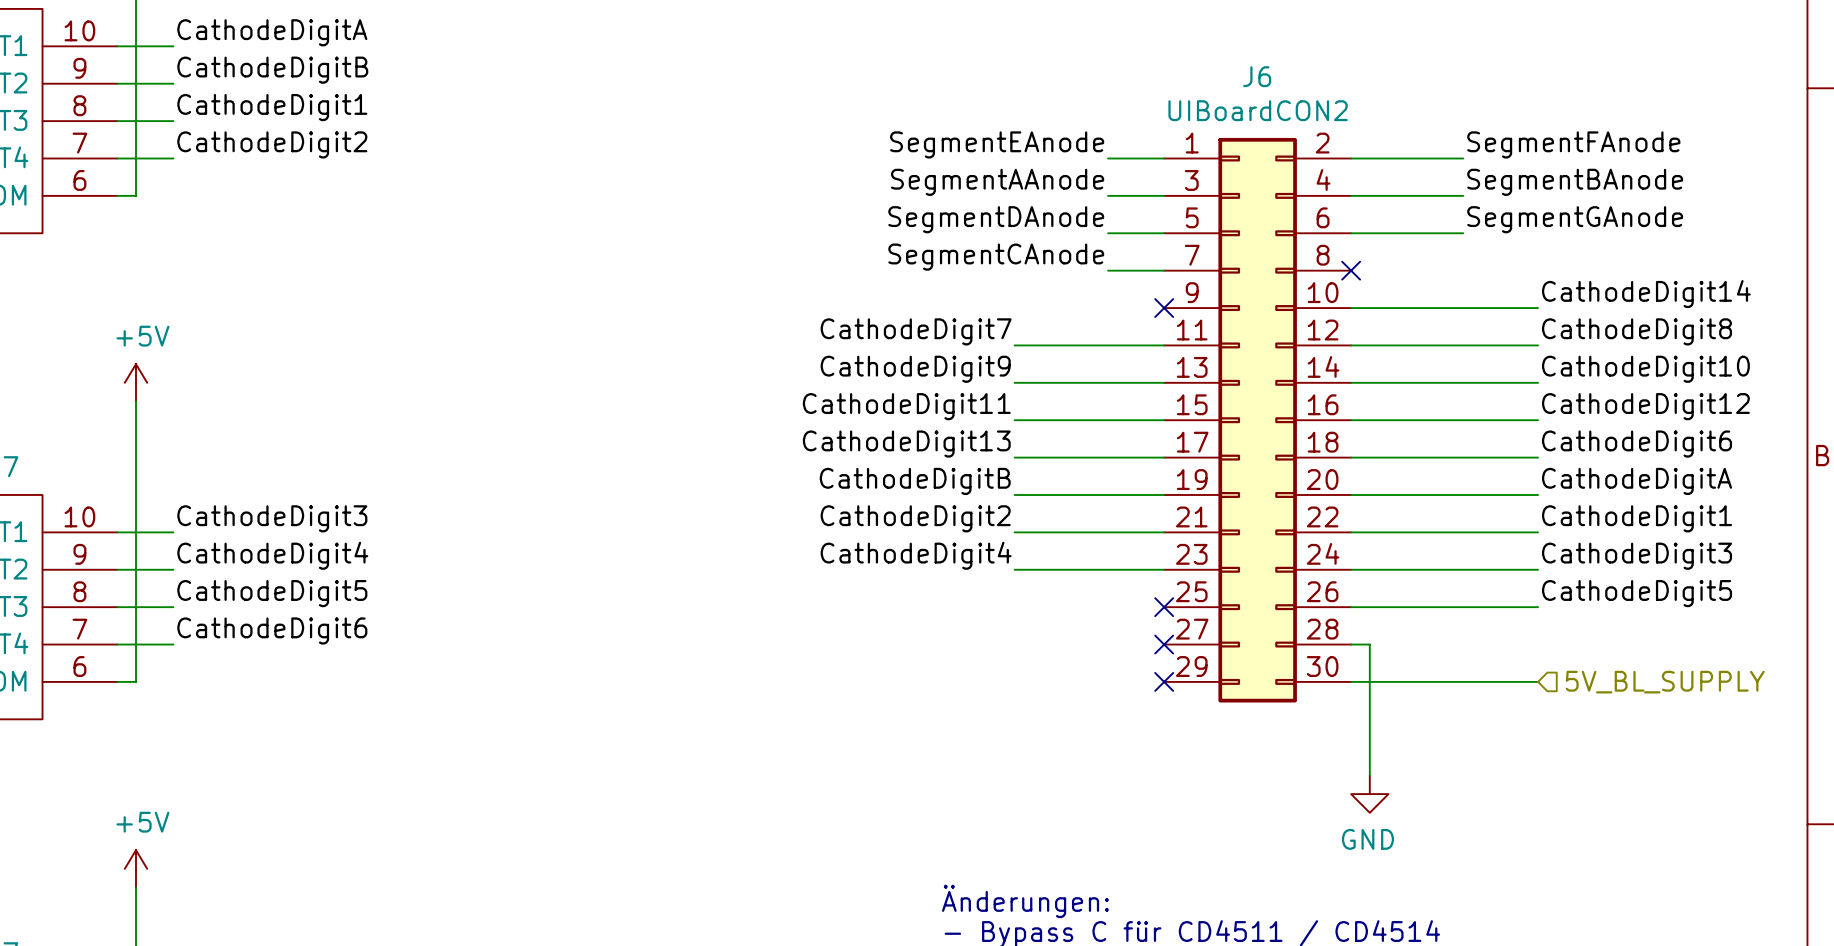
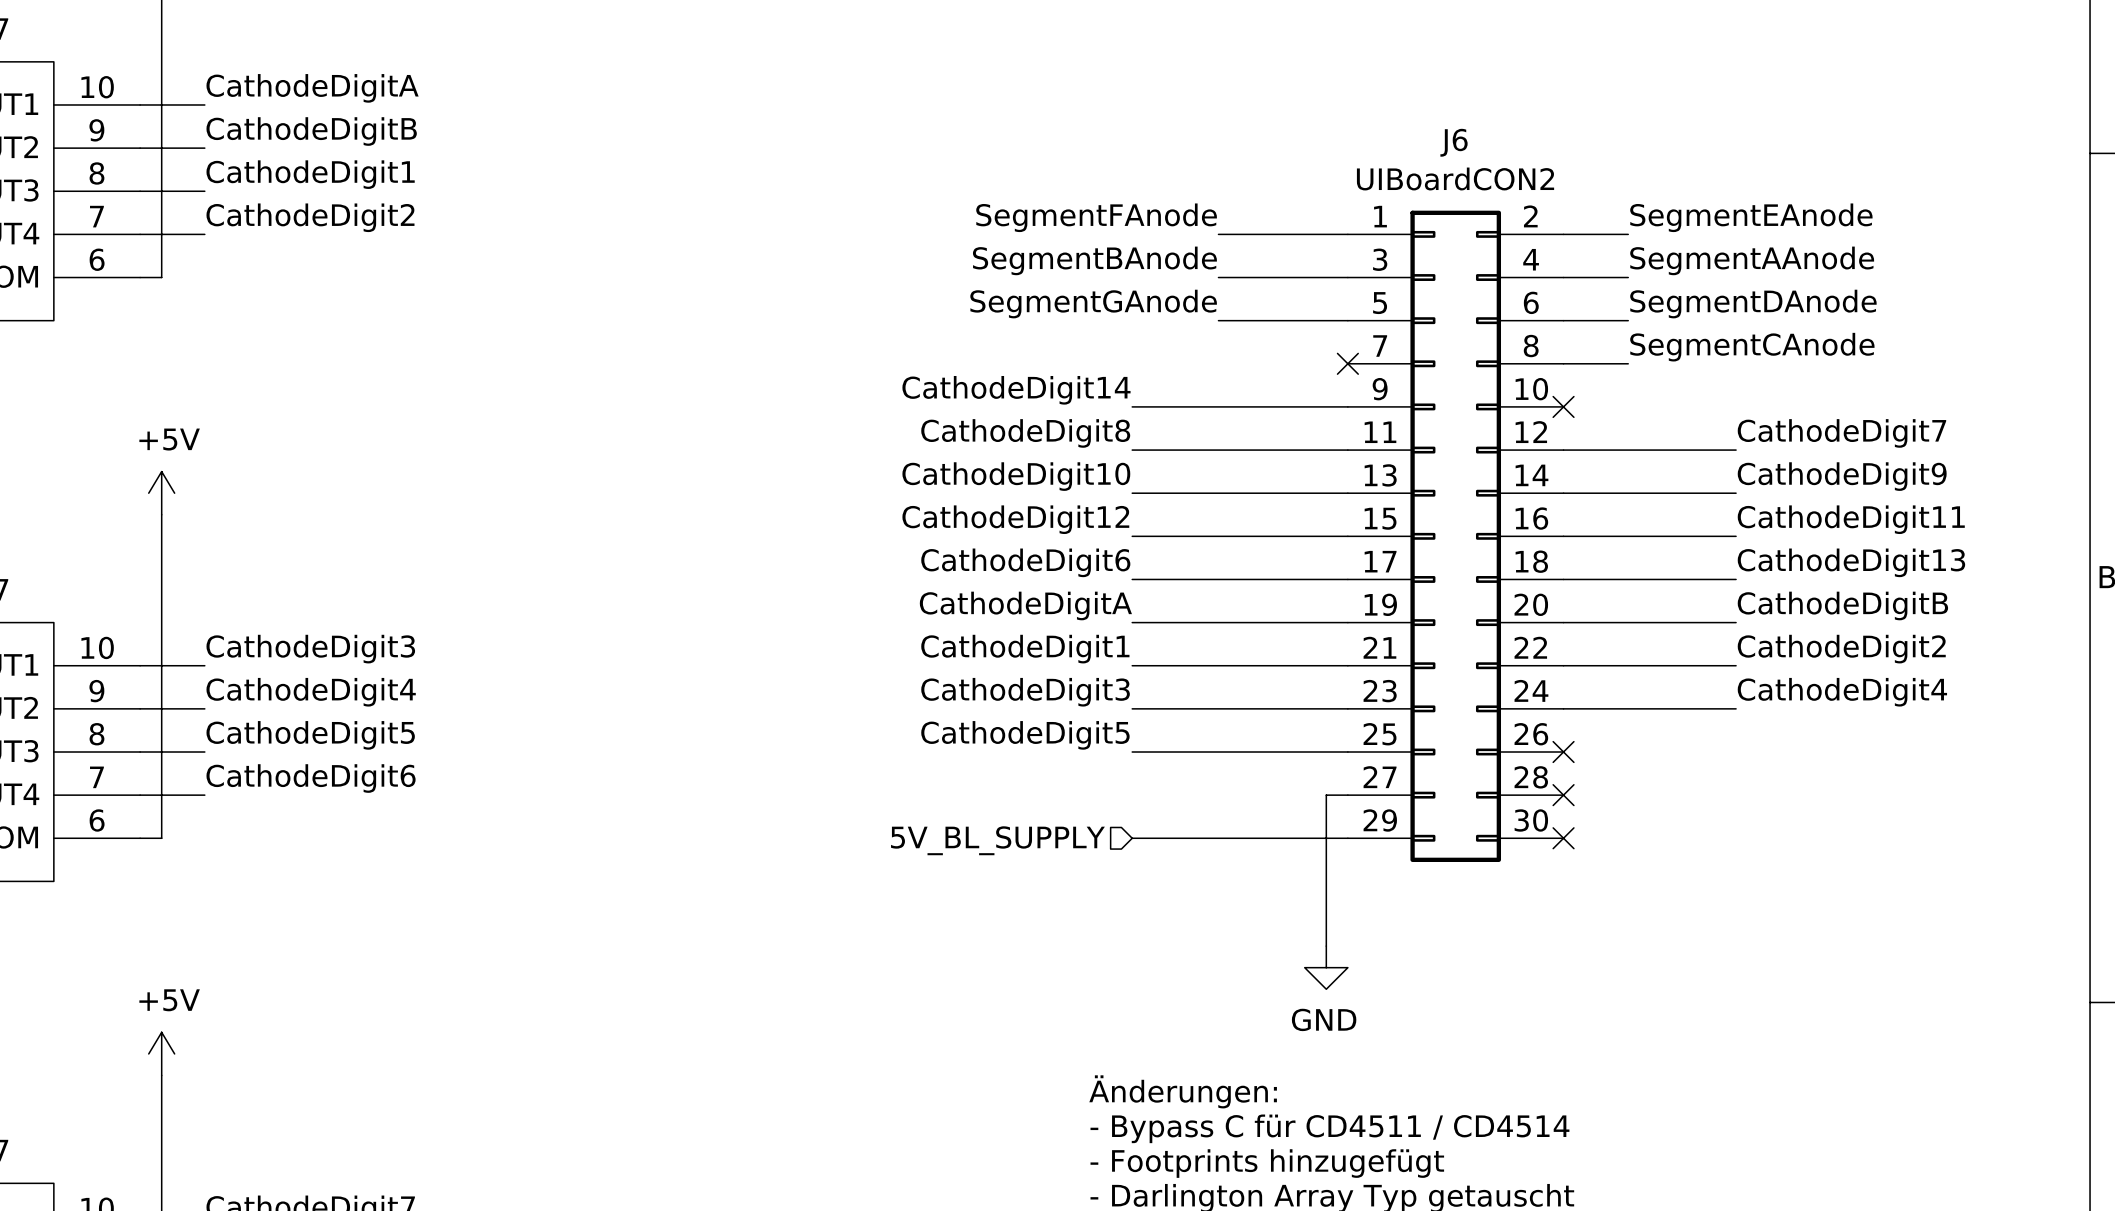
label: none -> SegmentFAnode (1096, 217)
label position: SegmentEAnode (997, 144) -> SegmentEAnode (1751, 217)
label: SegmentFAnode (1573, 144) -> none
wire: (1407, 158) (1463, 158) -> (1218, 234) (1283, 234)
label: none -> SegmentBAnode (1094, 260)
label position: SegmentAAnode (997, 182) -> SegmentAAnode (1752, 260)
label: SegmentBAnode (1575, 182) -> none
wire: (1407, 195) (1463, 195) -> (1218, 277) (1283, 277)
label: none -> SegmentGAnode (1093, 304)
label position: SegmentDAnode (996, 219) -> SegmentDAnode (1753, 304)
label: SegmentGAnode (1575, 219) -> none
wire: (1407, 233) (1463, 233) -> (1218, 320) (1283, 320)
label position: SegmentCAnode (996, 257) -> SegmentCAnode (1752, 347)
wire: (1108, 270) (1164, 270) -> (1563, 363) (1628, 363)
no-connect mark position: (1351, 270) -> (1563, 406)
label: none -> CathodeDigit14 (1016, 390)
label: CathodeDigit14 (1646, 294) -> none
wire: none -> (1132, 406) (1347, 406)
no-connect mark position: (1164, 308) -> (1347, 363)
wire: (1351, 308) (1538, 308) -> none
label: none -> CathodeDigit8 (1025, 433)
label: CathodeDigit7 (916, 331) -> none
label: none -> CathodeDigit7 (1841, 433)
label: CathodeDigit8 (1637, 331) -> none
wire: none -> (1132, 450) (1175, 450)
wire: (1500, 345) (1538, 345) -> none
label: none -> CathodeDigit10 (1016, 476)
label: CathodeDigit9 (915, 369) -> none
label: none -> CathodeDigit9 (1842, 476)
label: CathodeDigit10 (1645, 369) -> none
wire: none -> (1132, 493) (1175, 493)
wire: (1500, 382) (1538, 382) -> none
label: none -> CathodeDigit12 (1015, 519)
label: CathodeDigit11 (906, 406) -> none
label: none -> CathodeDigit11 (1851, 519)
label: CathodeDigit12 (1645, 406) -> none
wire: none -> (1132, 536) (1175, 536)
wire: (1500, 420) (1538, 420) -> none
label: none -> CathodeDigit6 (1025, 562)
label: CathodeDigit13 (906, 444) -> none
label: none -> CathodeDigit13 (1851, 562)
label: CathodeDigit6 (1637, 444) -> none
wire: none -> (1132, 579) (1175, 579)
wire: (1500, 457) (1538, 457) -> none
label: none -> CathodeDigitA (1025, 605)
label: CathodeDigitB (915, 481) -> none
label: none -> CathodeDigitB (1842, 605)
label: CathodeDigitA (1637, 481) -> none
wire: none -> (1132, 622) (1175, 622)
wire: (1500, 494) (1538, 494) -> none
label: none -> CathodeDigit1 (1025, 649)
label: CathodeDigit2 (915, 518) -> none
label: none -> CathodeDigit2 (1841, 649)
label: CathodeDigit1 (1637, 518) -> none
wire: none -> (1132, 665) (1175, 665)
wire: (1500, 532) (1538, 532) -> none
label: CathodeDigit4 (916, 555) -> none
label: none -> CathodeDigit4 (1842, 692)
label: none -> CathodeDigit3 (1025, 692)
label: CathodeDigit3 (1637, 556) -> none
wire: none -> (1132, 708) (1175, 708)
wire: (1500, 569) (1538, 569) -> none
label: none -> CathodeDigit5 (1025, 735)
label: CathodeDigit5 (1637, 593) -> none
wire: none -> (1132, 752) (1347, 752)
no-connect mark: (1164, 607) -> none
wire: (1351, 607) (1538, 607) -> none
no-connect mark: none -> (1563, 752)
wire: none -> (1347, 795) (1326, 795) (1326, 946)
no-connect mark: (1164, 644) -> none
wire: (1351, 644) (1369, 644) (1369, 775) -> none
no-connect mark: none -> (1563, 795)
wire: none -> (1132, 838) (1347, 838)
no-connect mark: (1164, 681) -> none
wire: (1351, 681) (1538, 681) -> none
no-connect mark: none -> (1563, 838)
hierarchical label: none -> 5V_BL_SUPPLY (997, 840)
hierarchical label: 5V_BL_SUPPLY (1665, 682) -> none
power symbol position: GND (1369, 794) -> GND (1326, 967)

